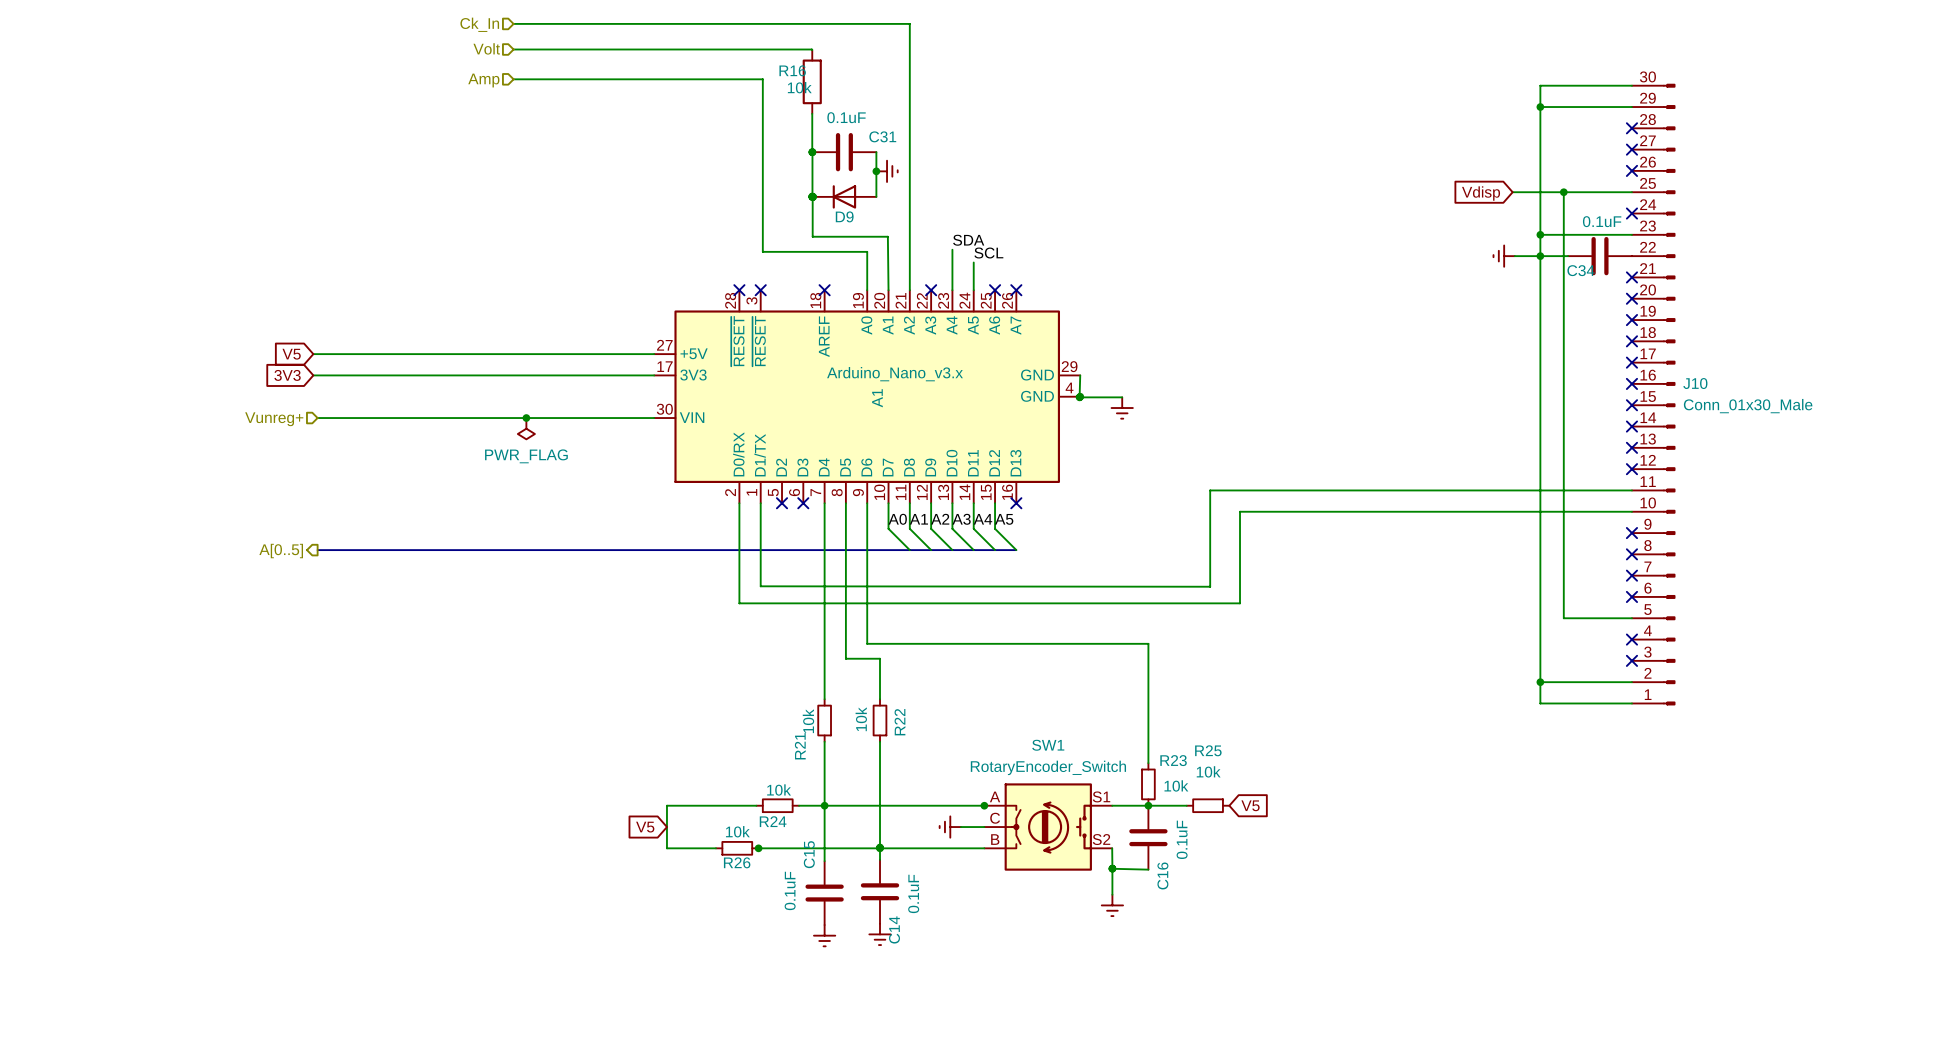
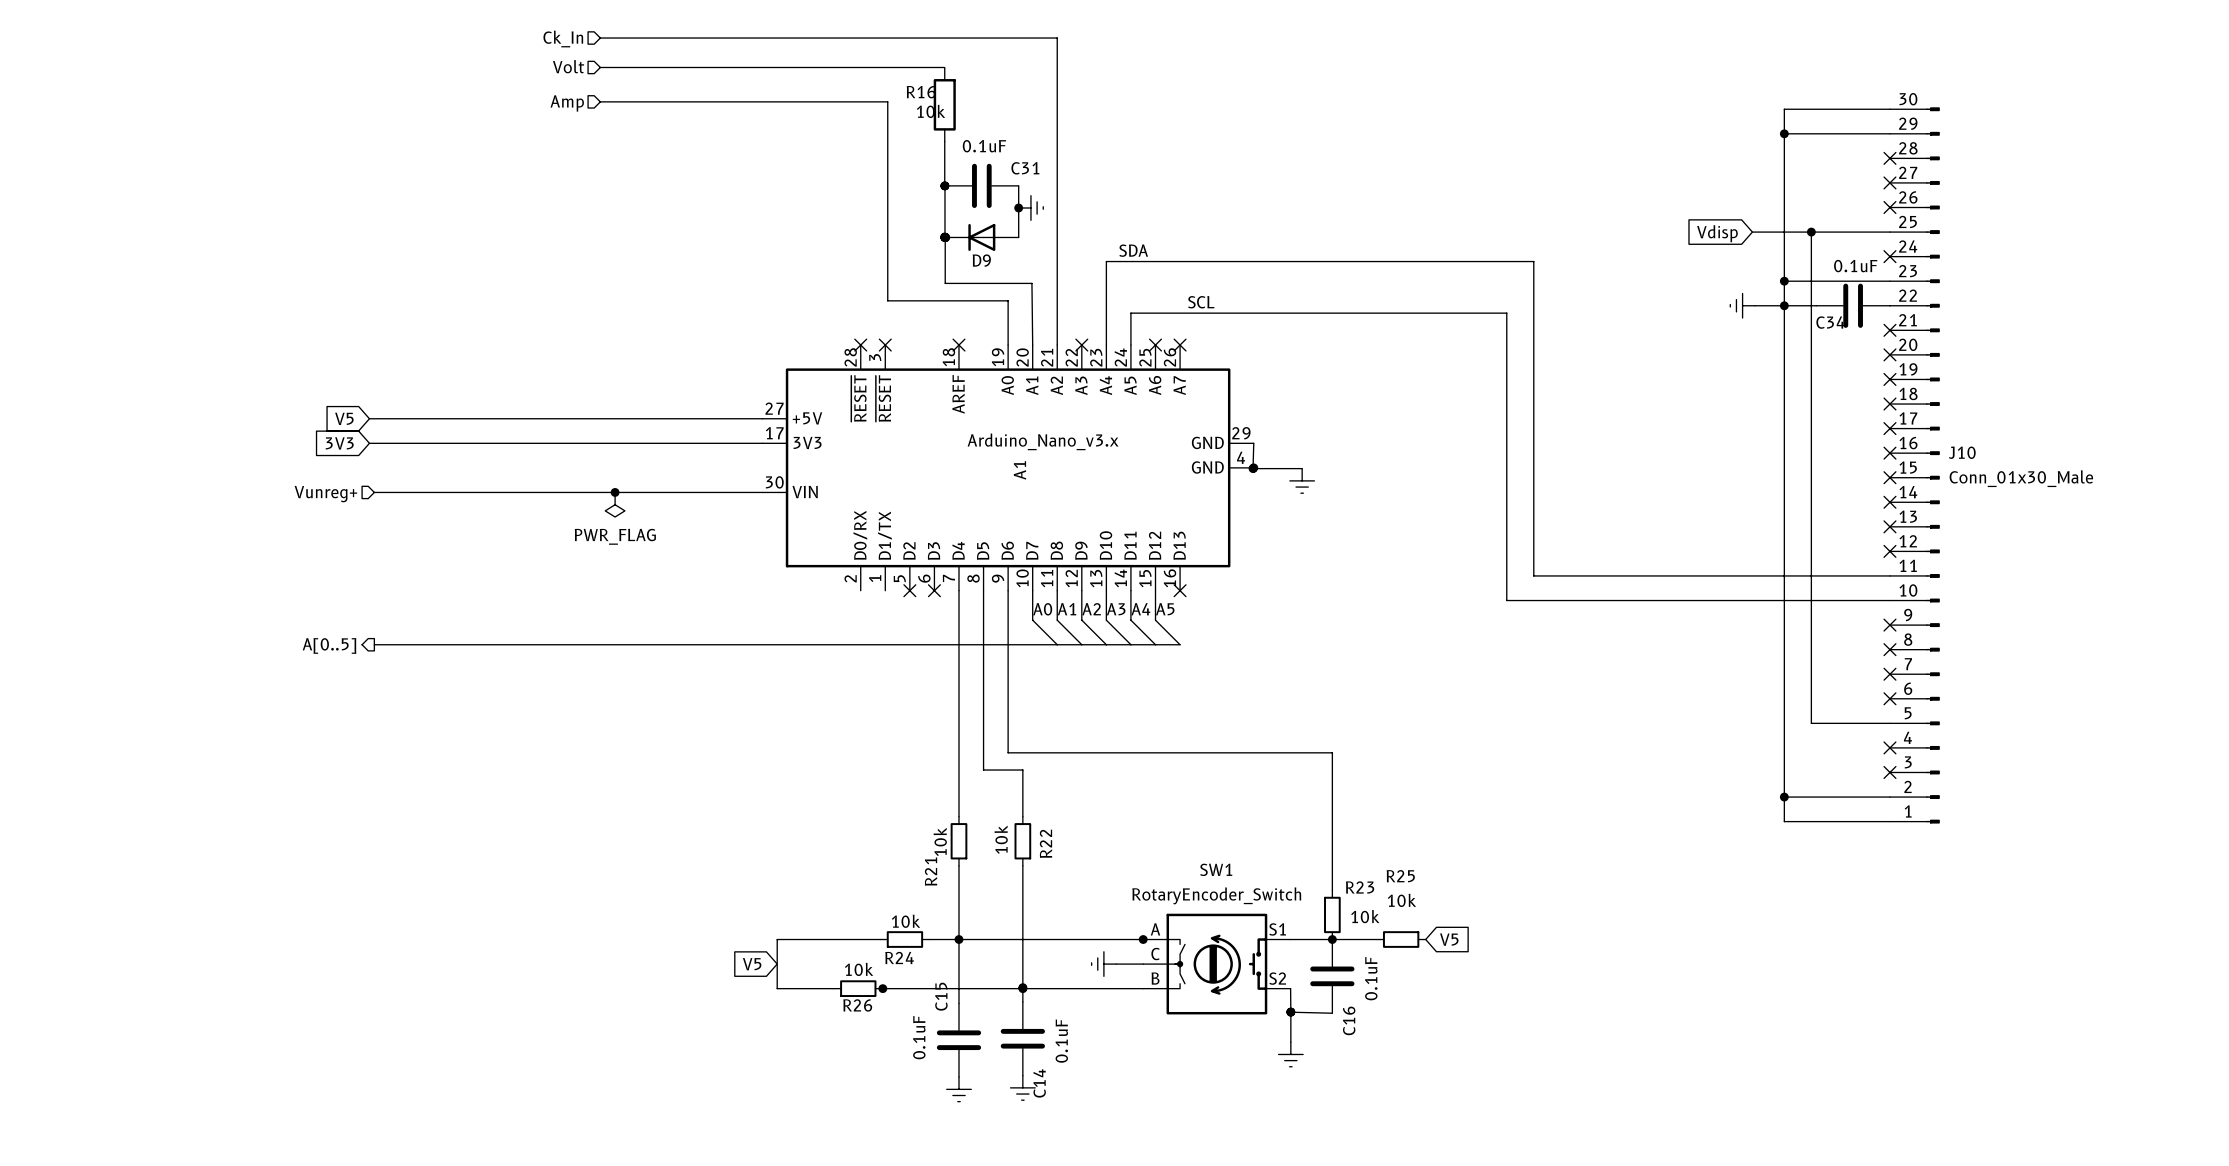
label position: SDA (968, 240) -> SDA (1133, 250)
label position: SCL (988, 253) -> SCL (1201, 302)
wire: (1323, 490) (1210, 490) (1210, 586) (760, 586) (760, 503) -> (1533, 575) (1533, 261) (1106, 261) (1106, 298)
wire: (739, 503) (739, 603) (1240, 603) (1240, 511) (1299, 511) -> (1130, 313) (1506, 313) (1506, 600)

